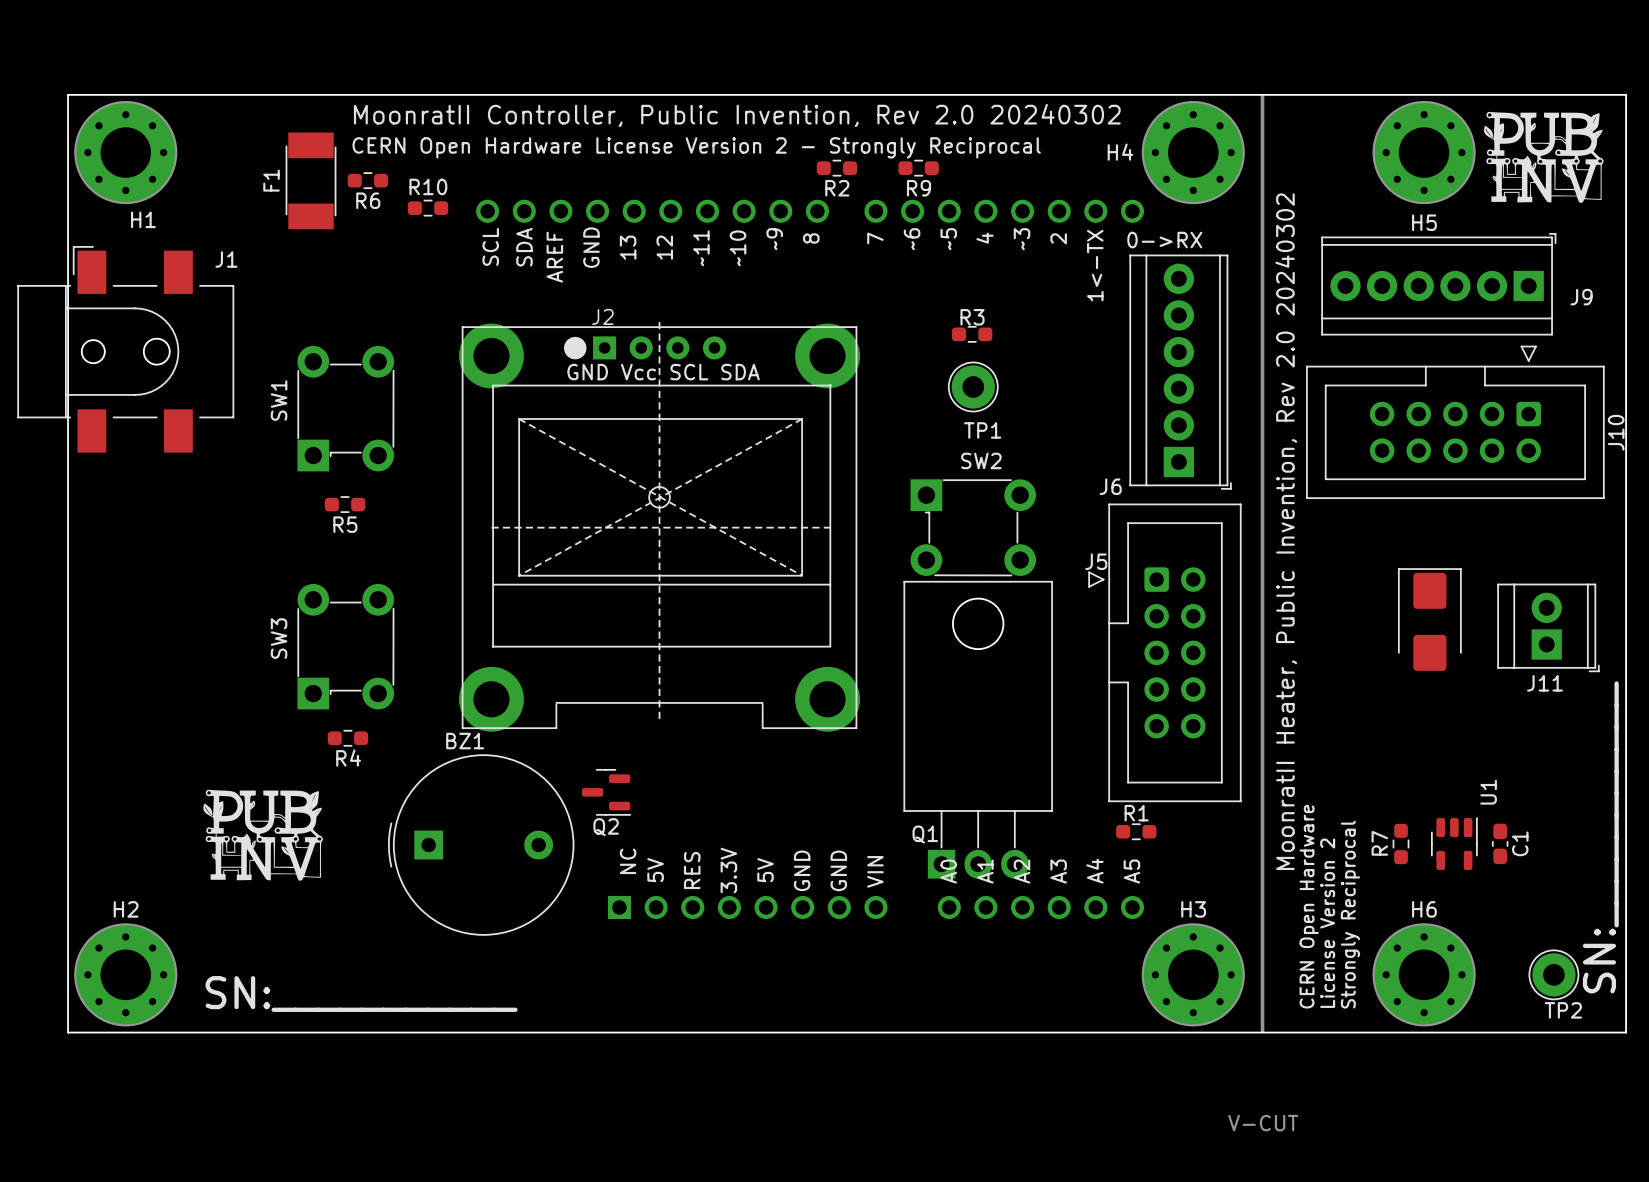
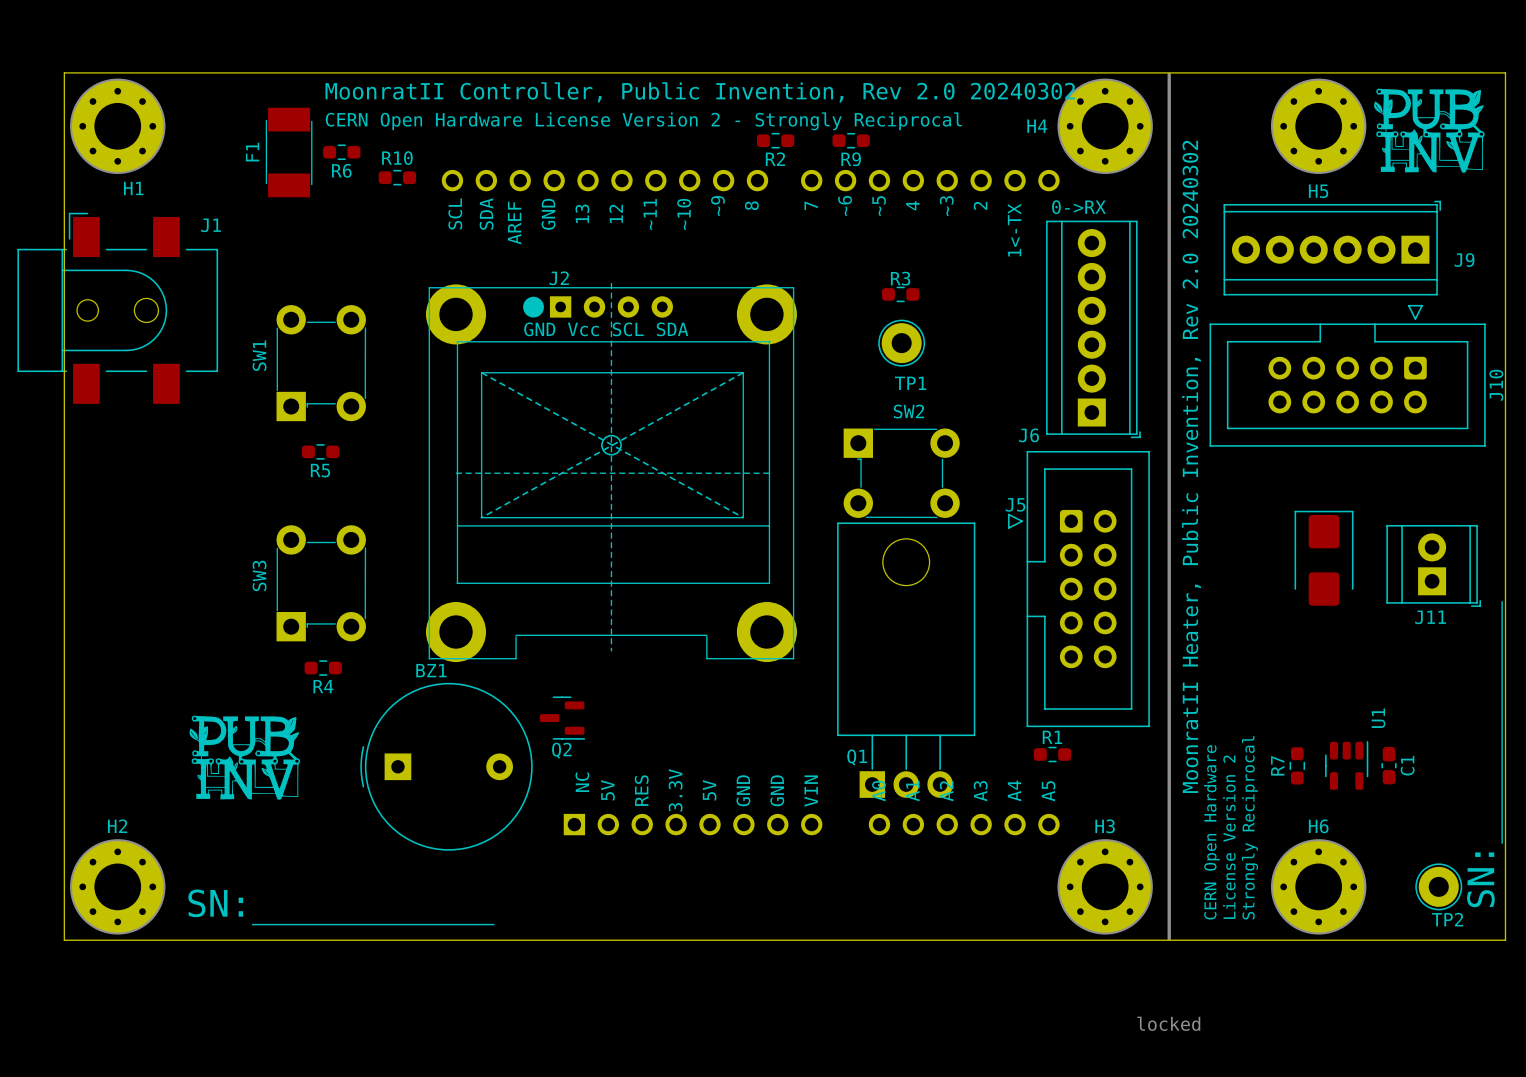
text: V-CUT (1263, 1123) -> locked (1168, 1023)

